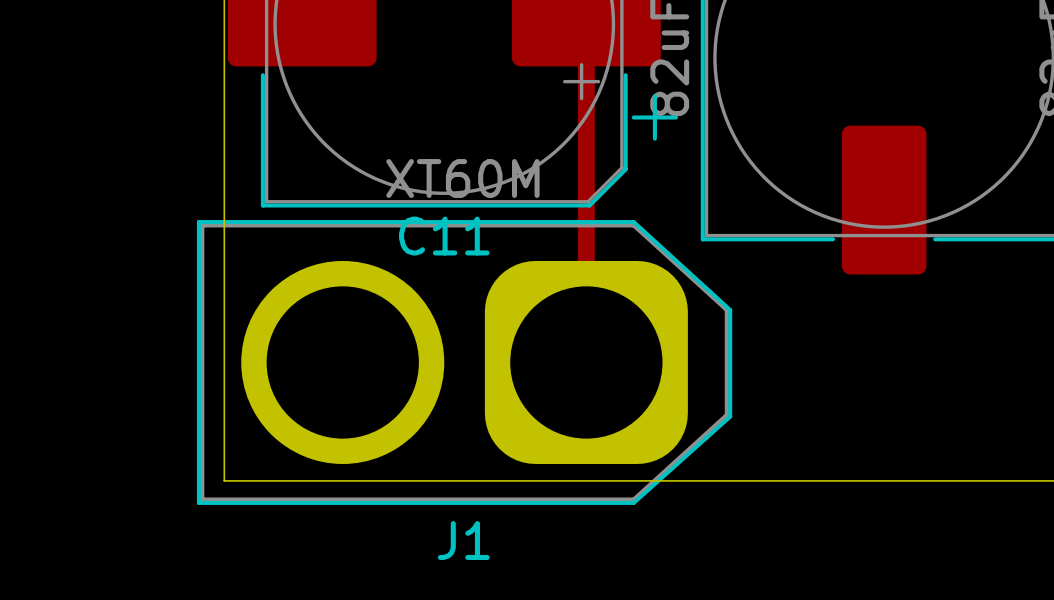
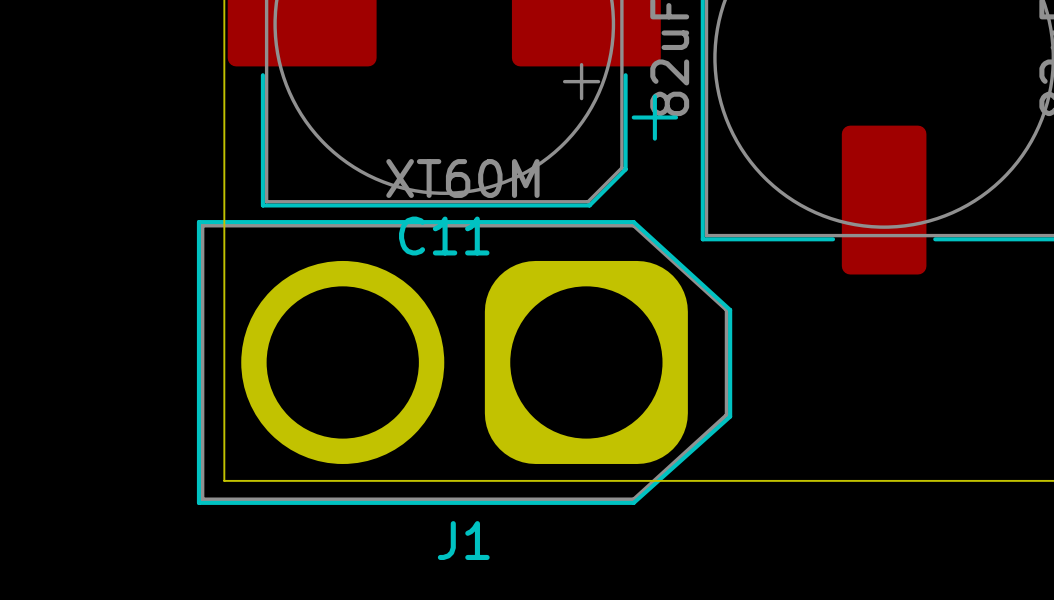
top track: (586, 24) (586, 362) -> none

